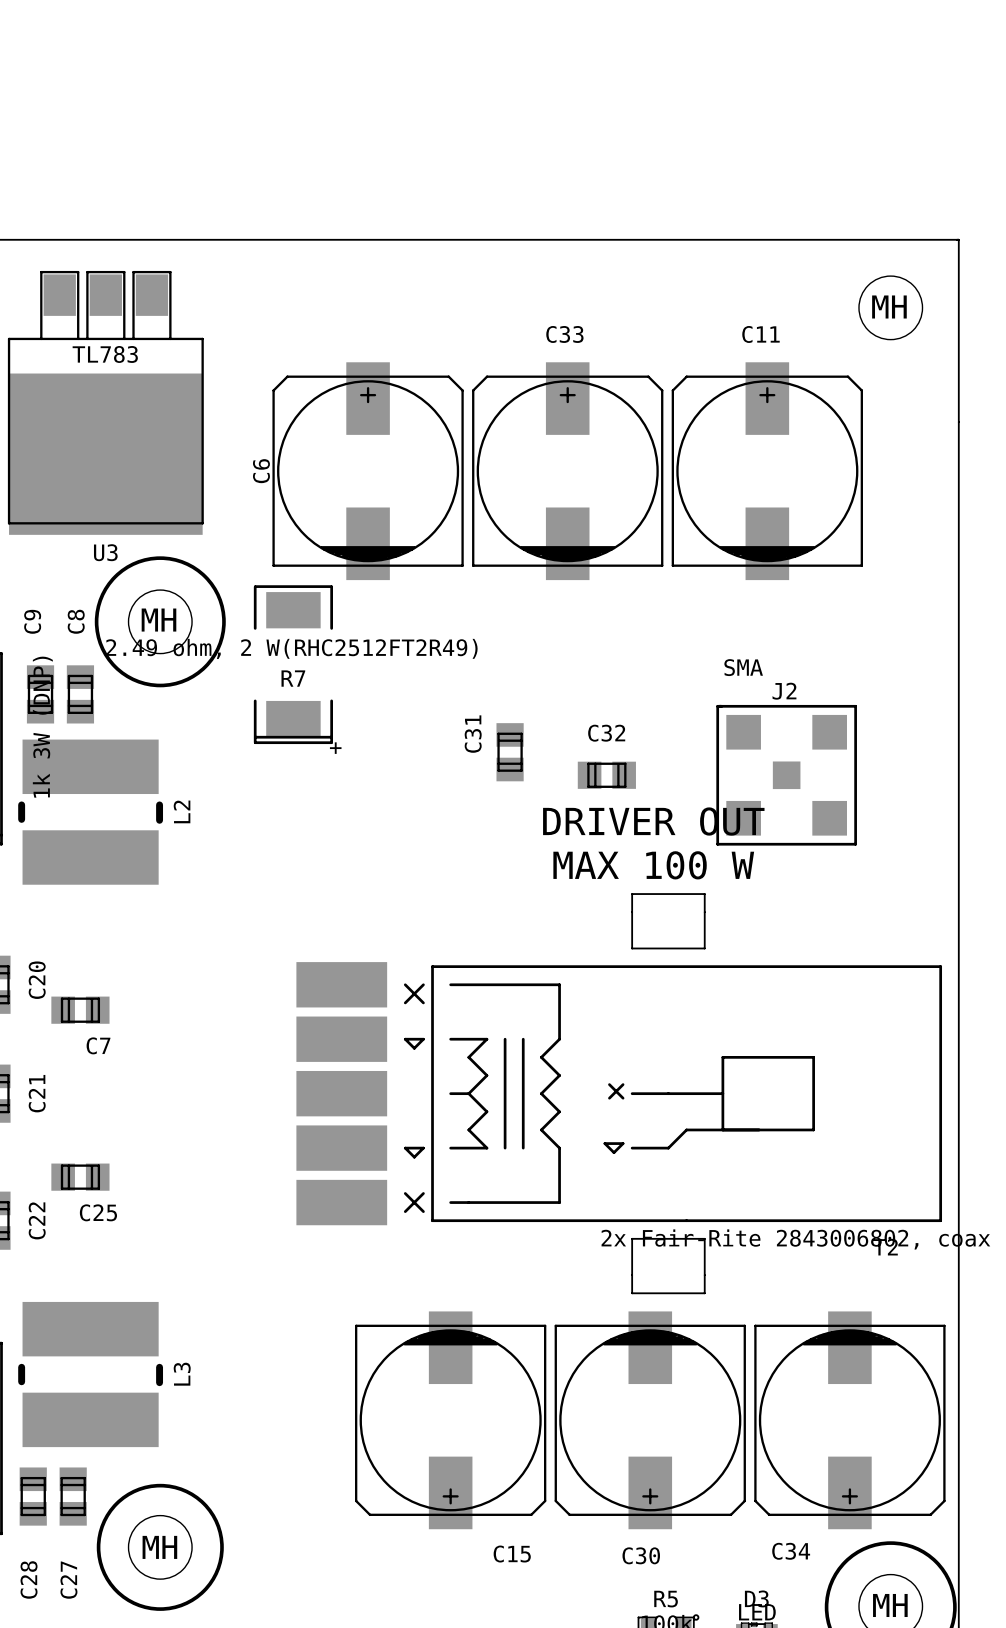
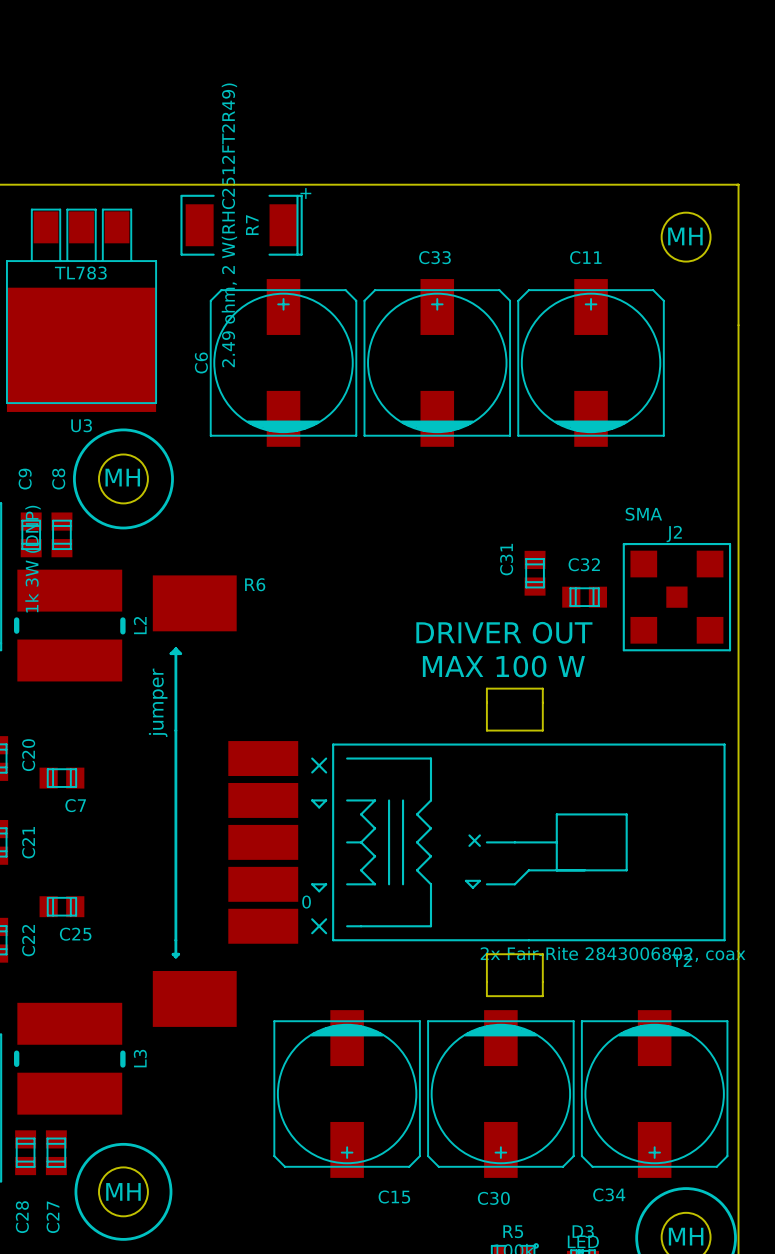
R7 rotation: 0° (293, 664) -> 90° counterclockwise (241, 225)
R7 position: (293, 664) -> (241, 225)
C31 position: (510, 752) -> (535, 573)
C32 position: (606, 775) -> (584, 597)
J2 position: (786, 775) -> (676, 597)
line: none -> (175, 648) (175, 957)
line: none -> (175, 648) (180, 653)
line: none -> (175, 648) (170, 653) (180, 653)
text: none -> jumper (158, 702)
R6: none -> 0 (194, 801)
line: none -> (175, 957) (178, 954) (173, 954) (175, 957)

